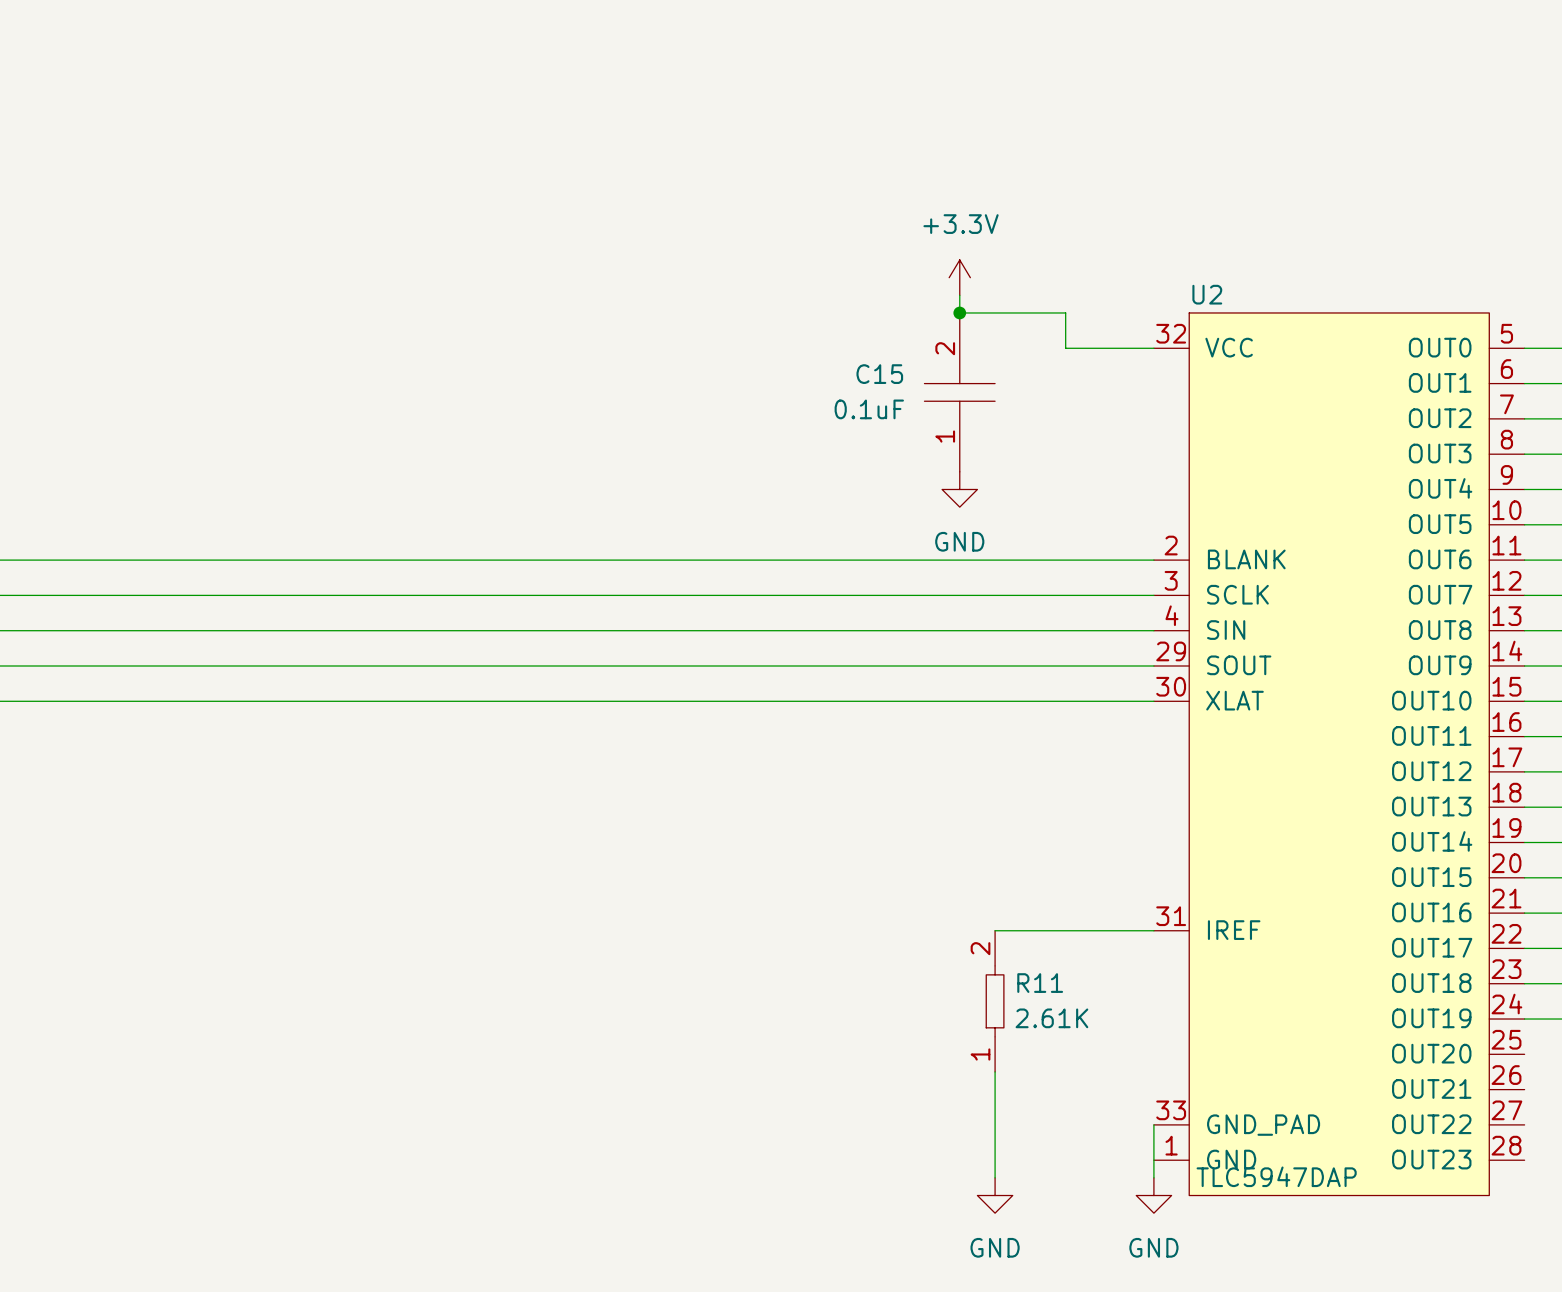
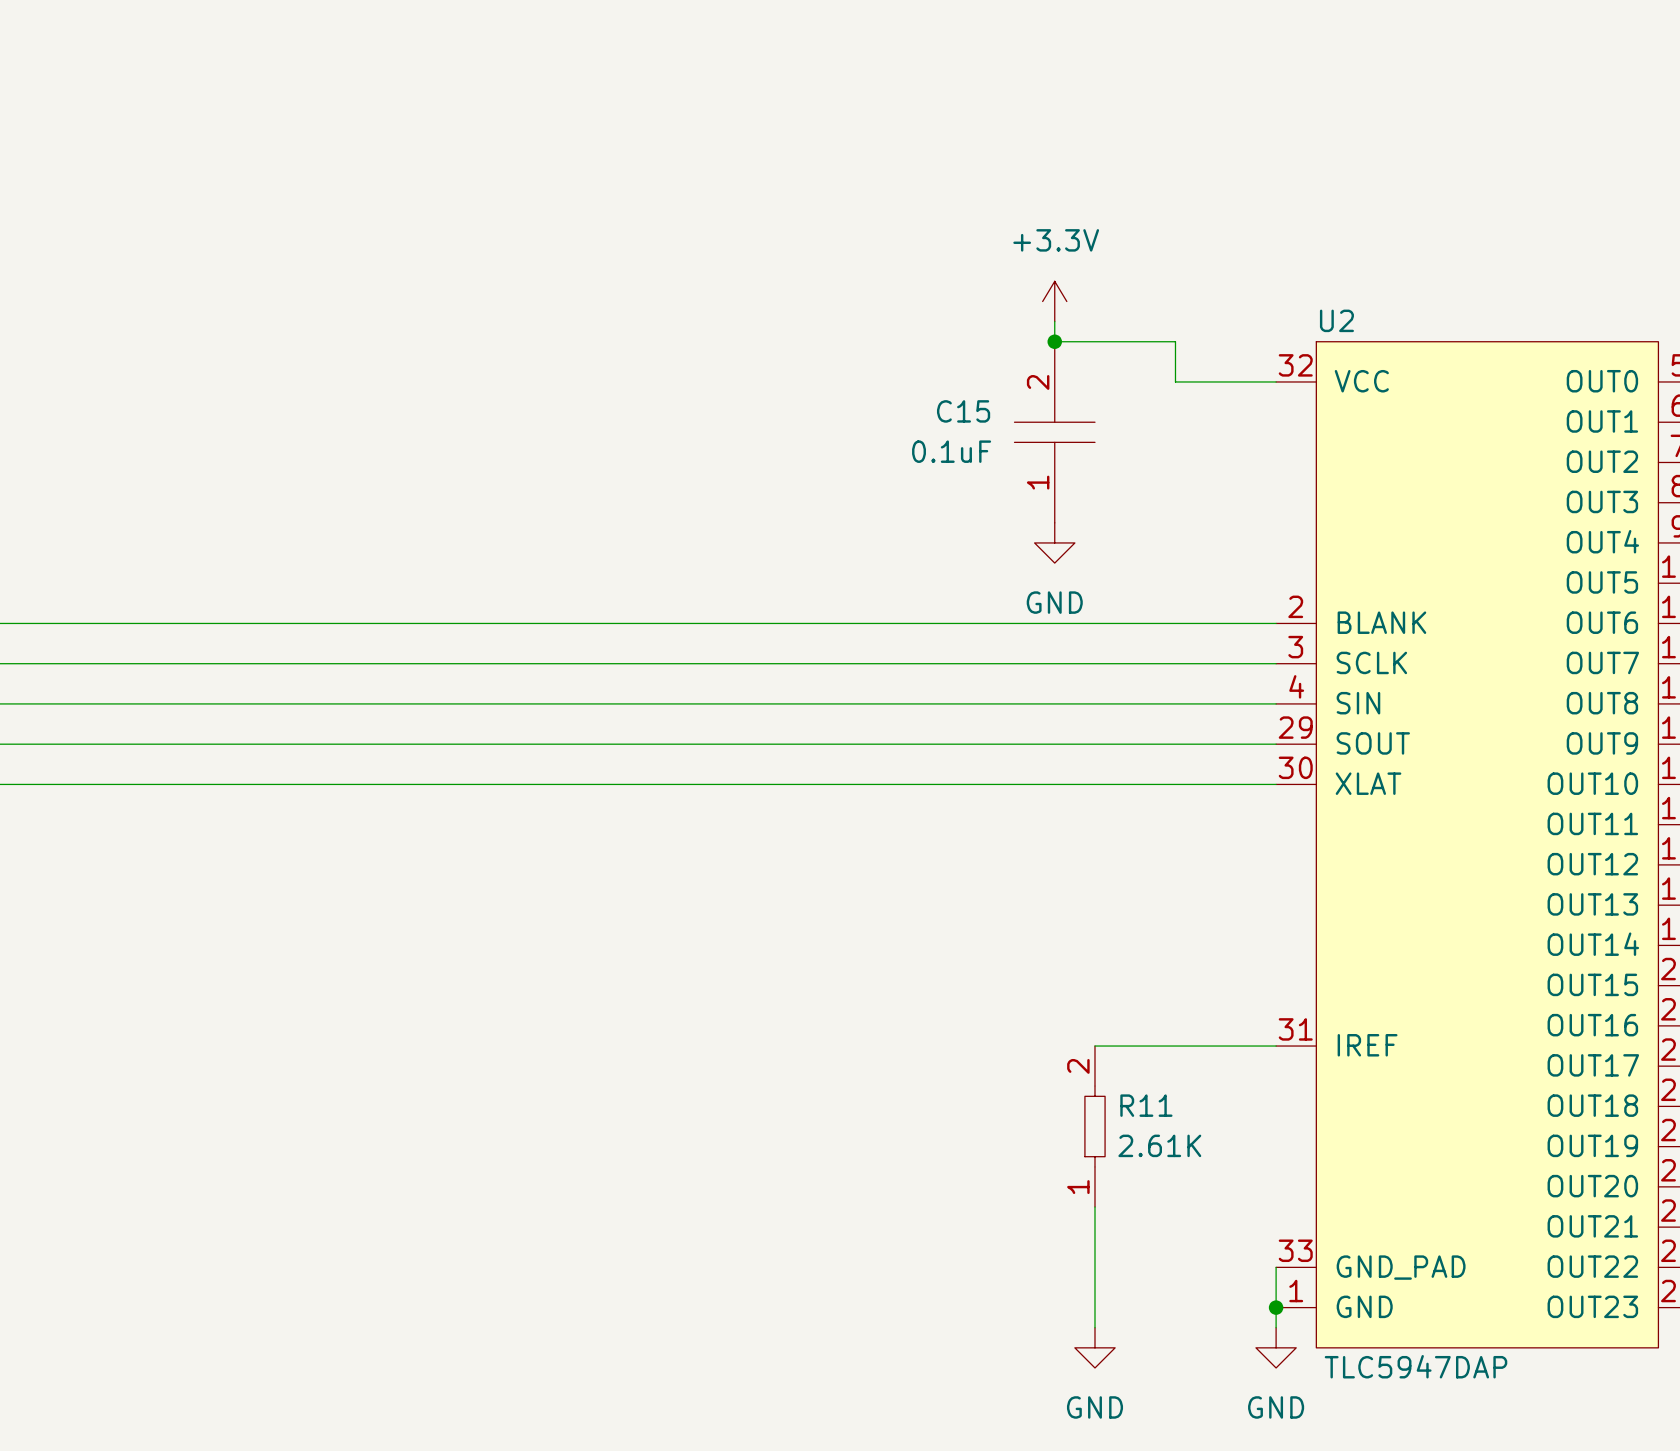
junction: none -> (1276, 1307)
U2 text position: TLC5947DAP (1276, 1176) -> TLC5947DAP (1415, 1366)

